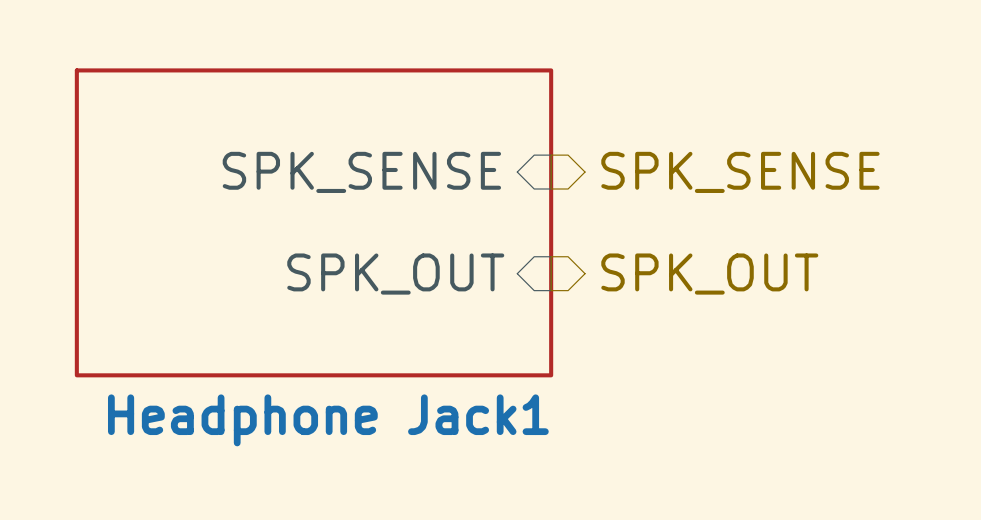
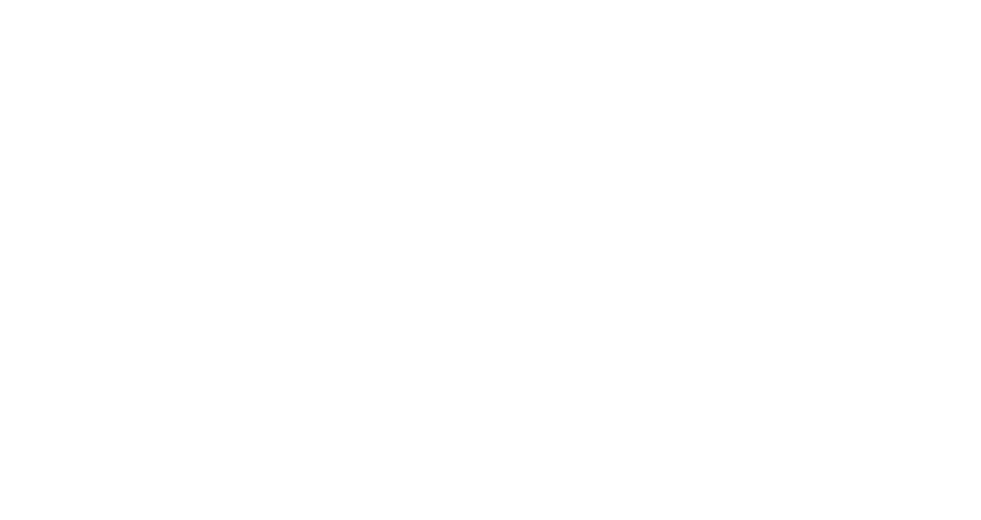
sheet pin: SPK_SENSE (361, 172) -> none
hierarchical label: SPK_SENSE (740, 172) -> none
sheet Headphone Jack1: (314, 222) -> none
sheet pin: SPK_OUT (395, 274) -> none
hierarchical label: SPK_OUT (709, 274) -> none

